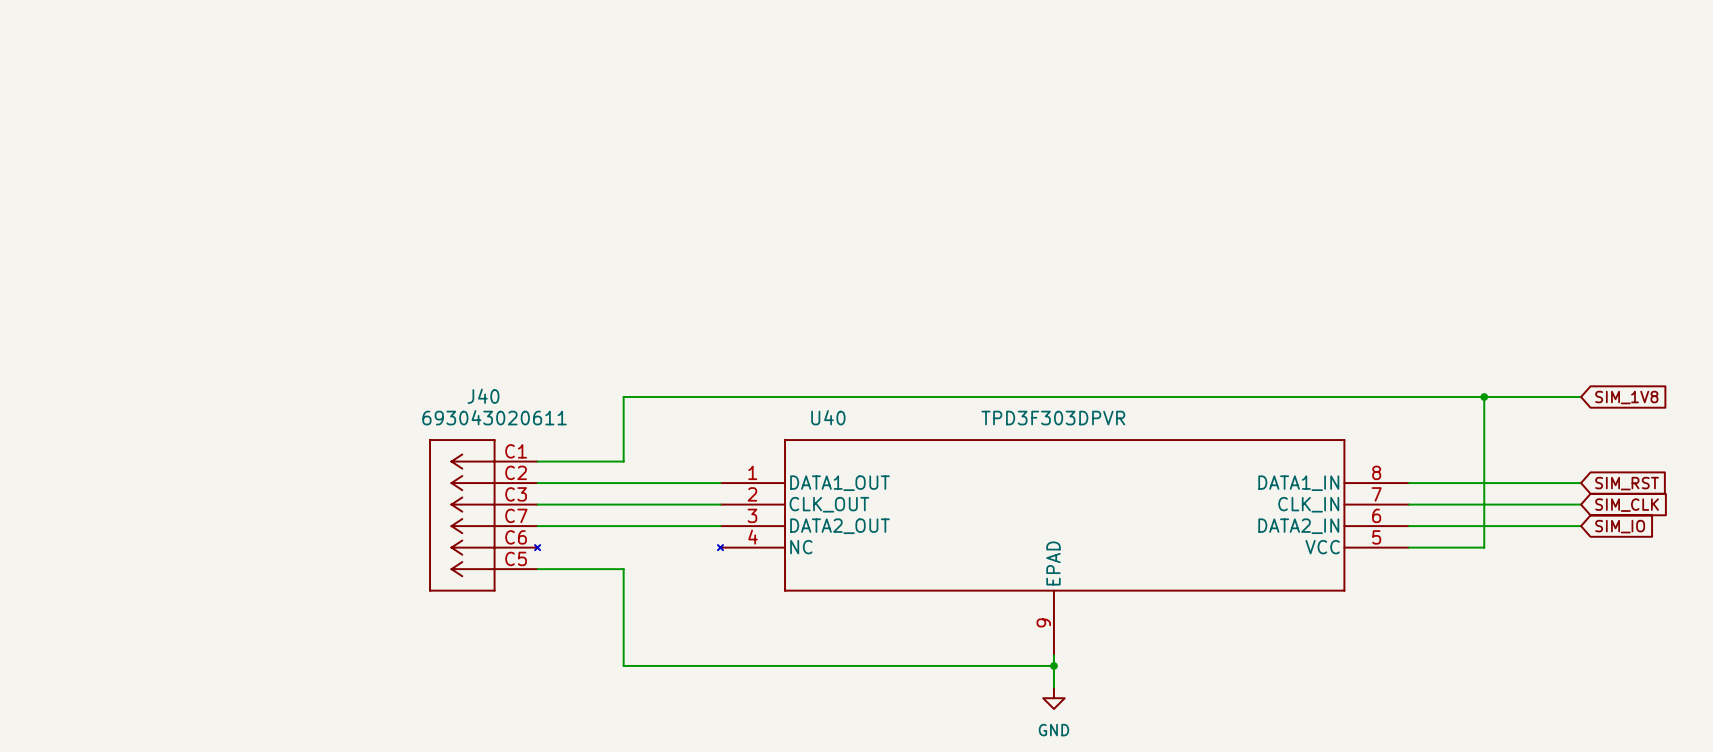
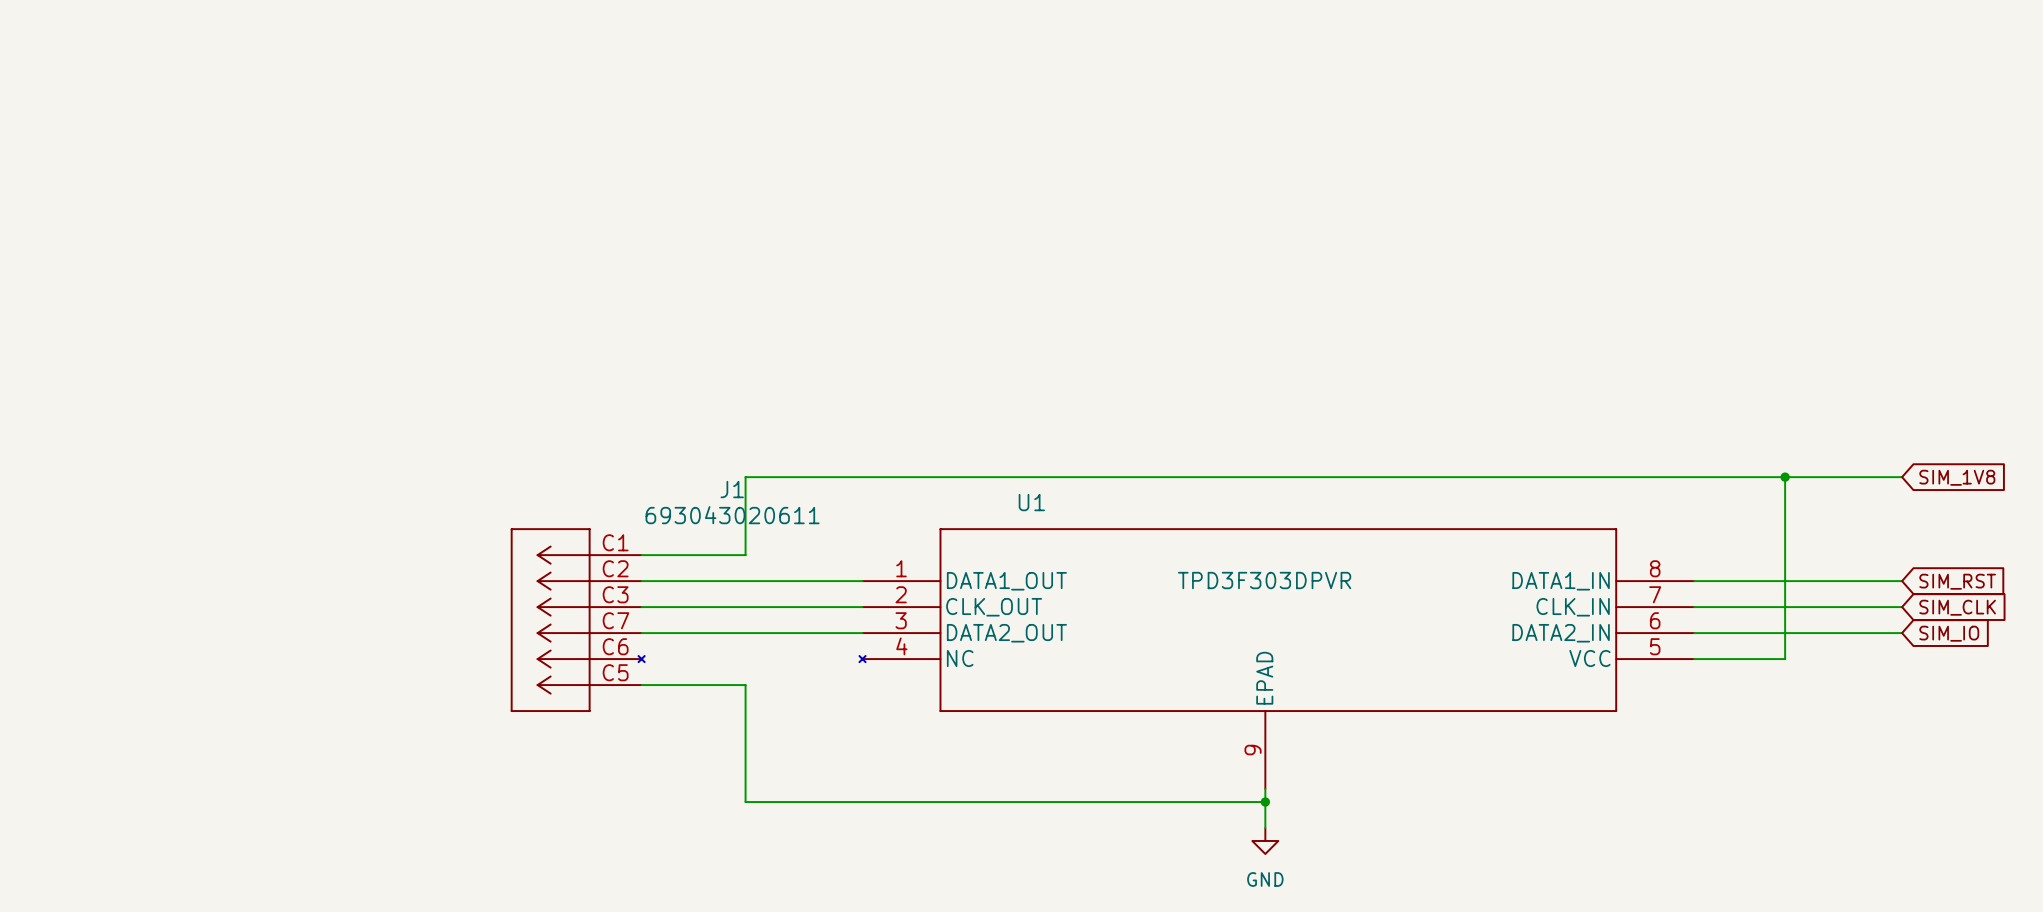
J40 name: J40 (483, 396) -> J1 (732, 489)
J40 value position: 693043020611 (494, 417) -> 693043020611 (732, 515)
U40 name: U40 (828, 417) -> U1 (1031, 502)
U40 value position: TPD3F303DPVR (1053, 418) -> TPD3F303DPVR (1264, 580)

